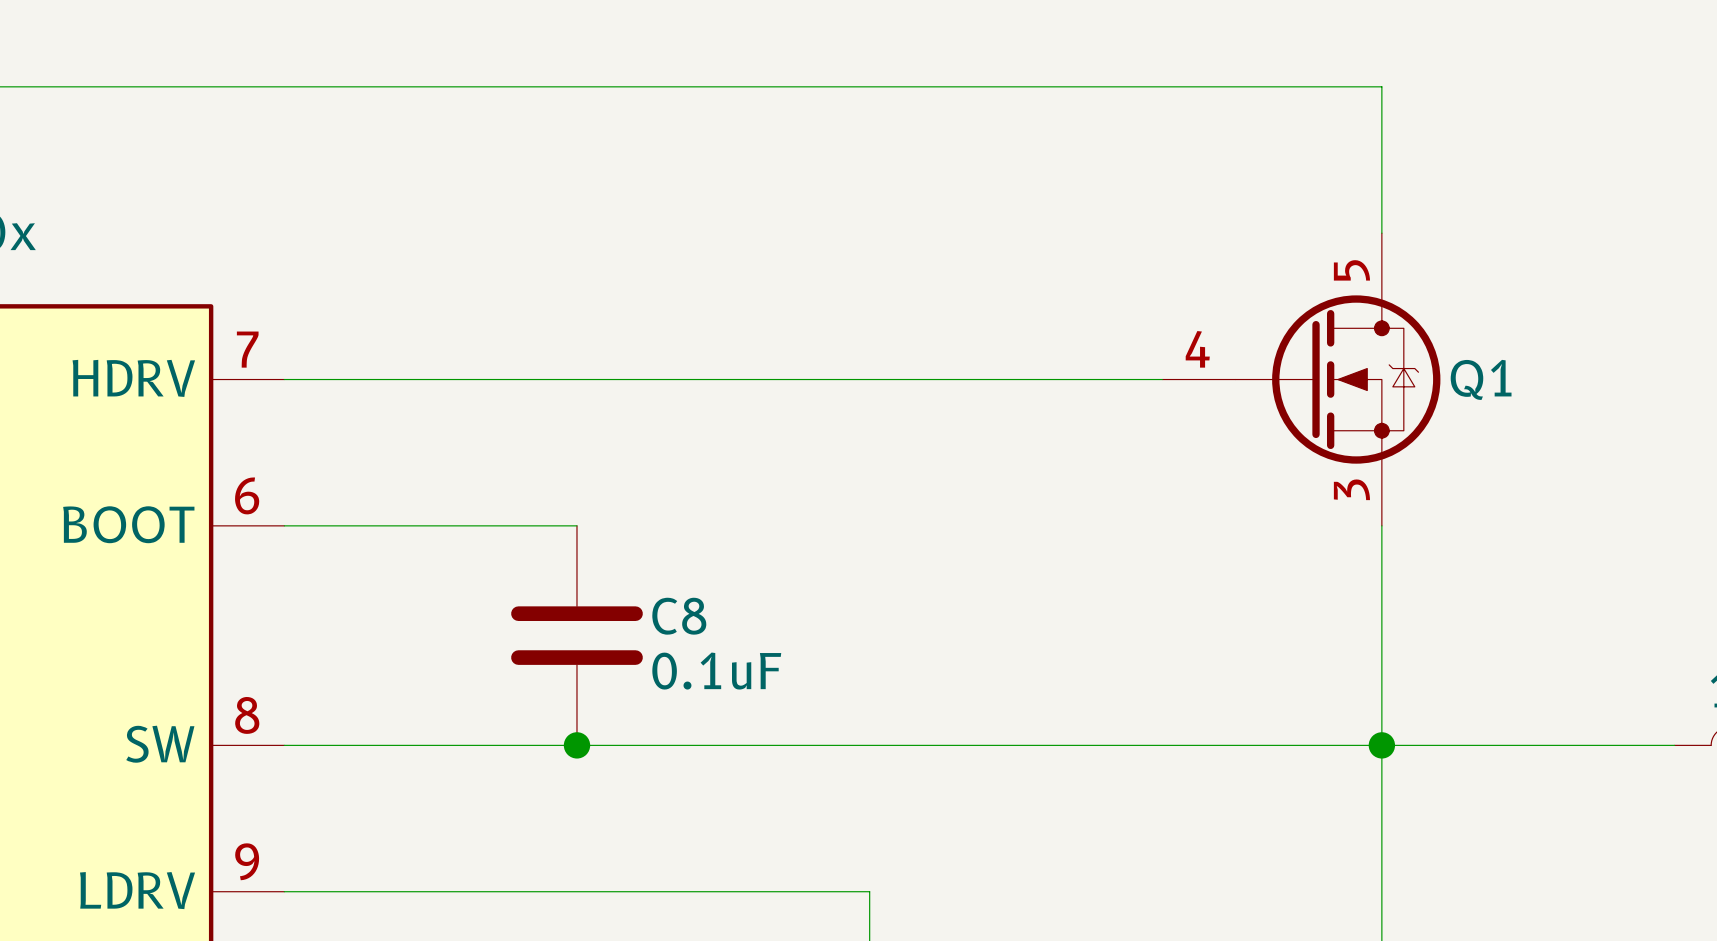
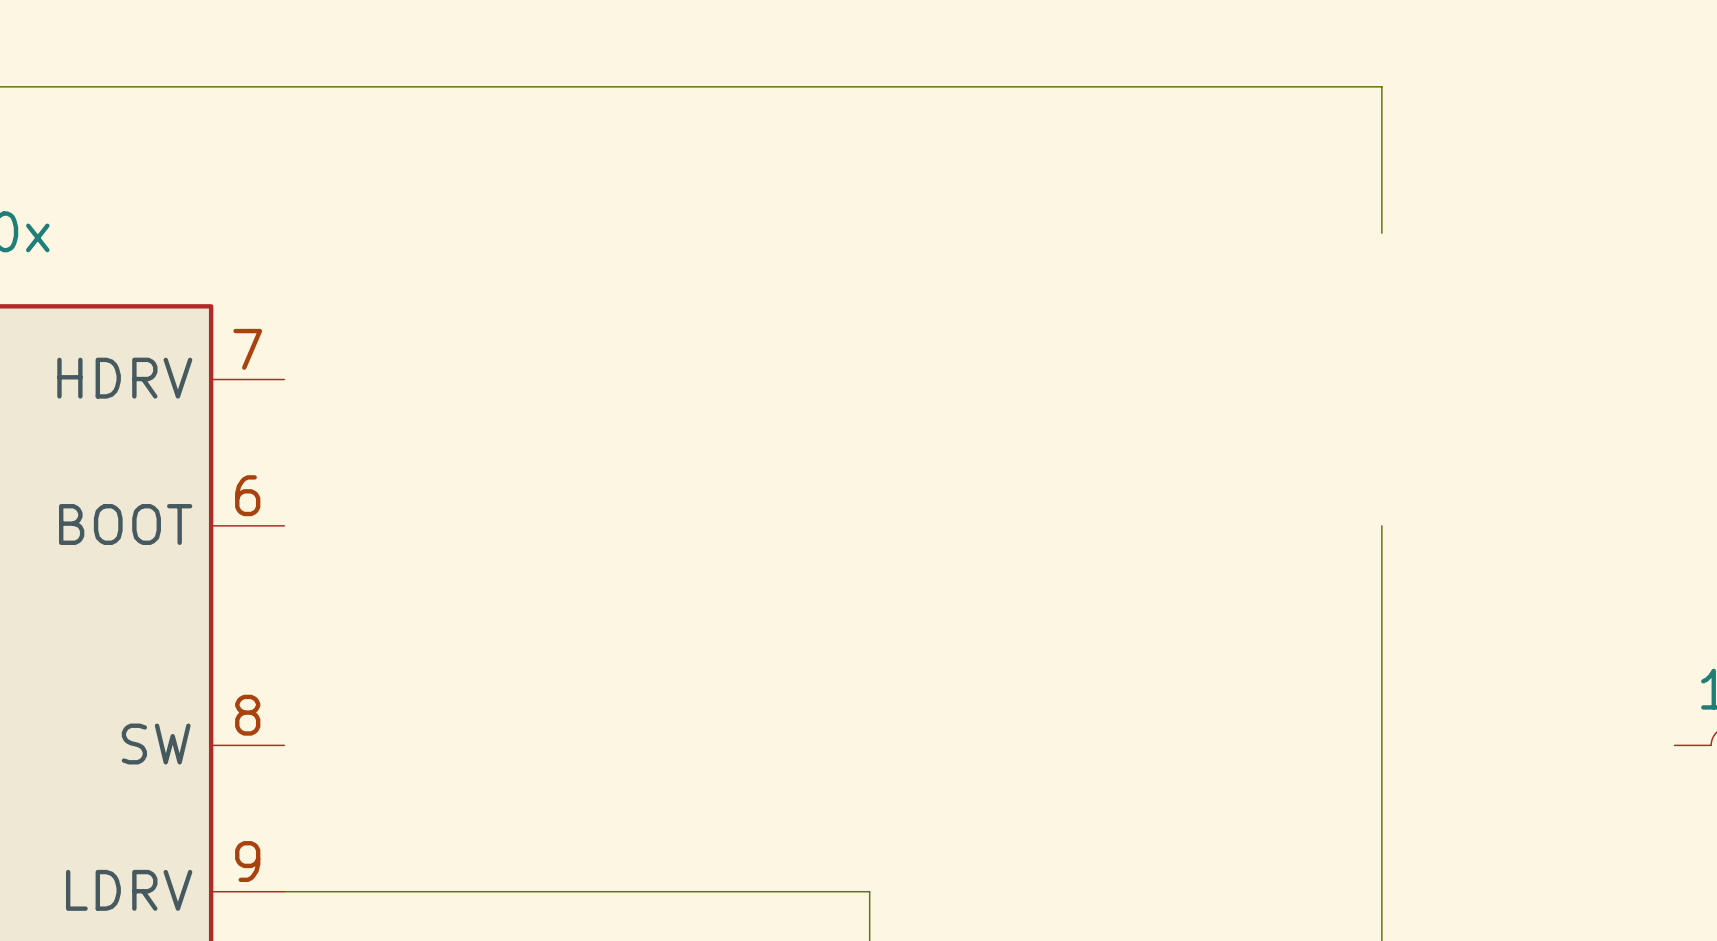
wire: (284, 379) (1162, 379) -> none
Q1: (1301, 379) -> none
wire: (284, 525) (576, 525) -> none
C8: 0.1uF (576, 635) -> none
wire: (284, 745) (1674, 745) -> none
junction: (576, 745) -> none
junction: (1381, 745) -> none

